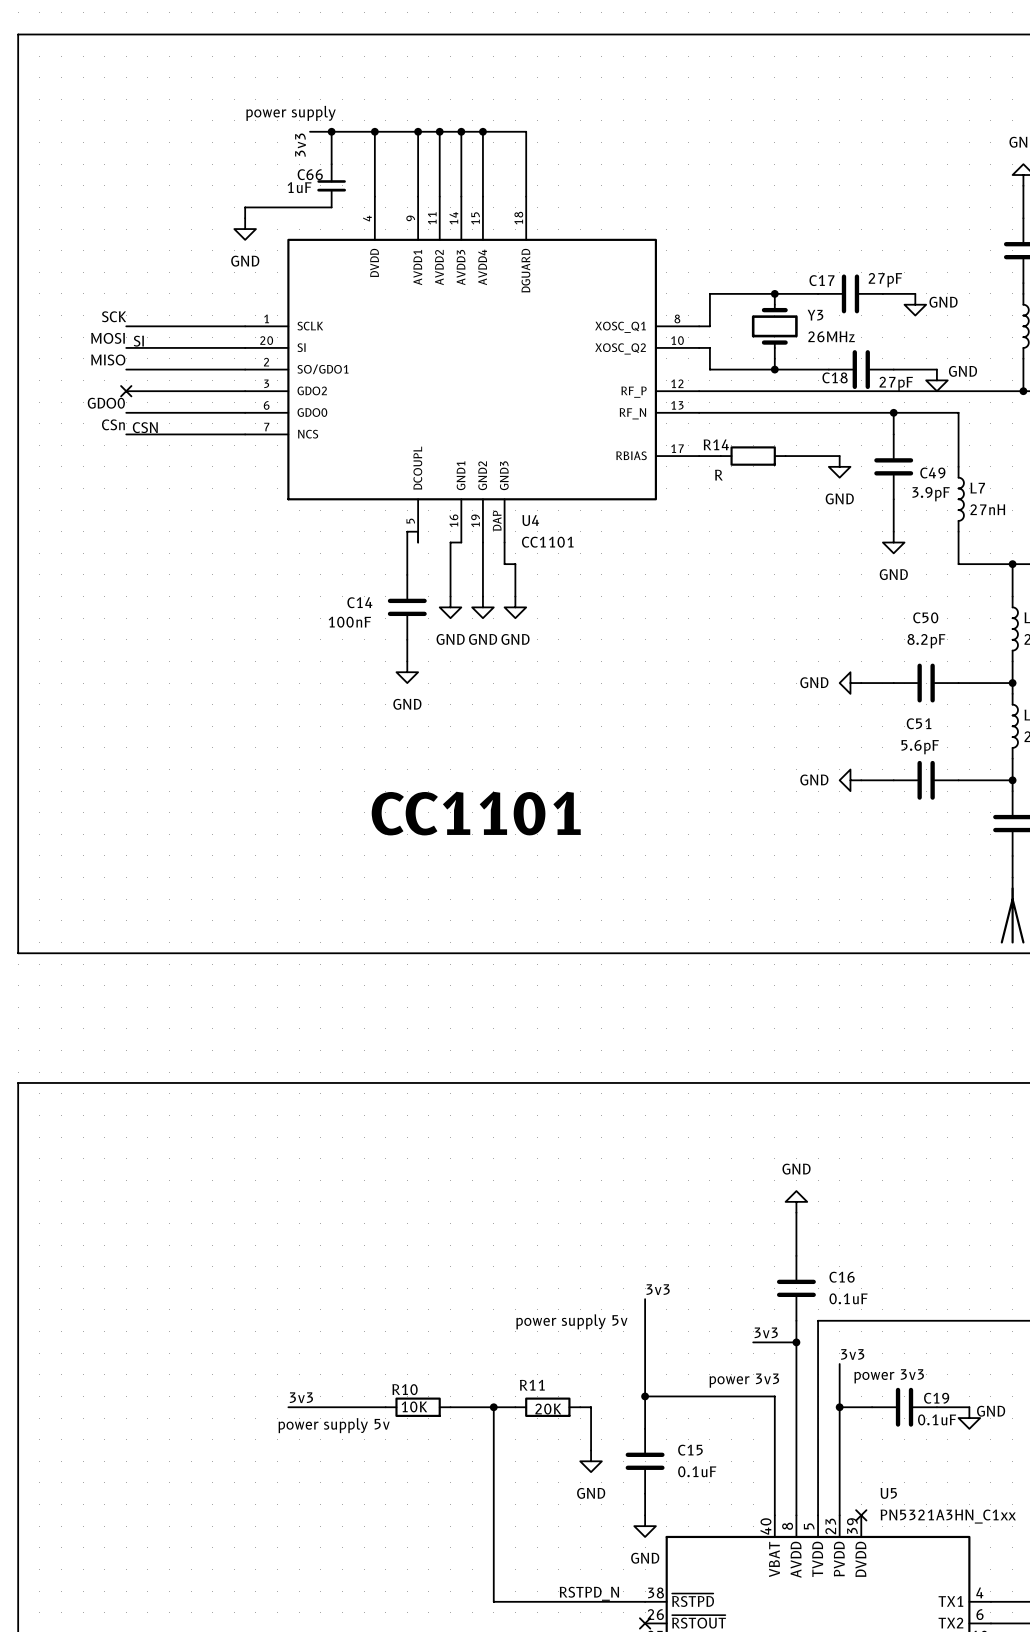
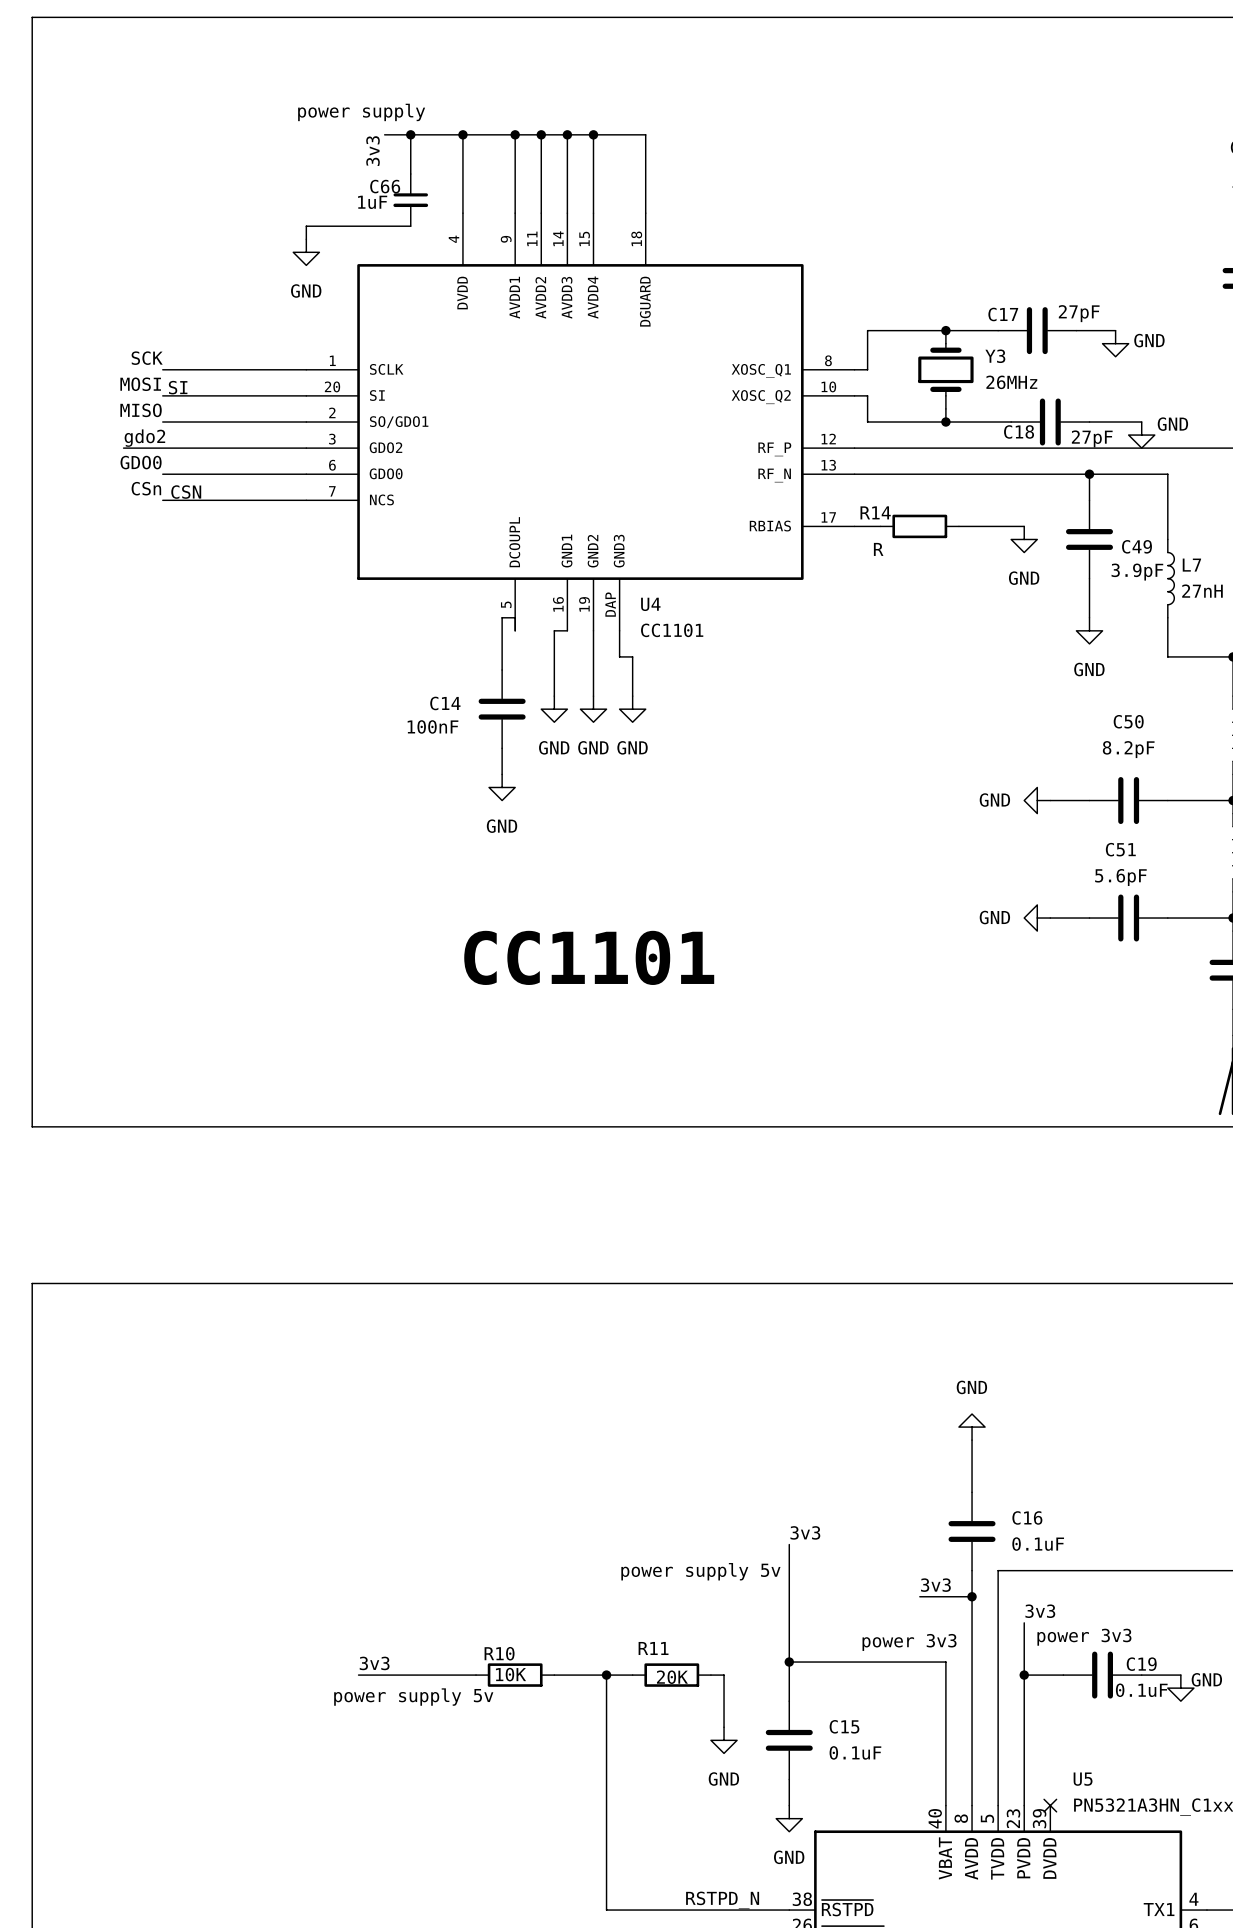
label: none -> gdo2 (144, 438)
wire: none -> (123, 448) (162, 448)
no-connect mark: (126, 391) -> none

